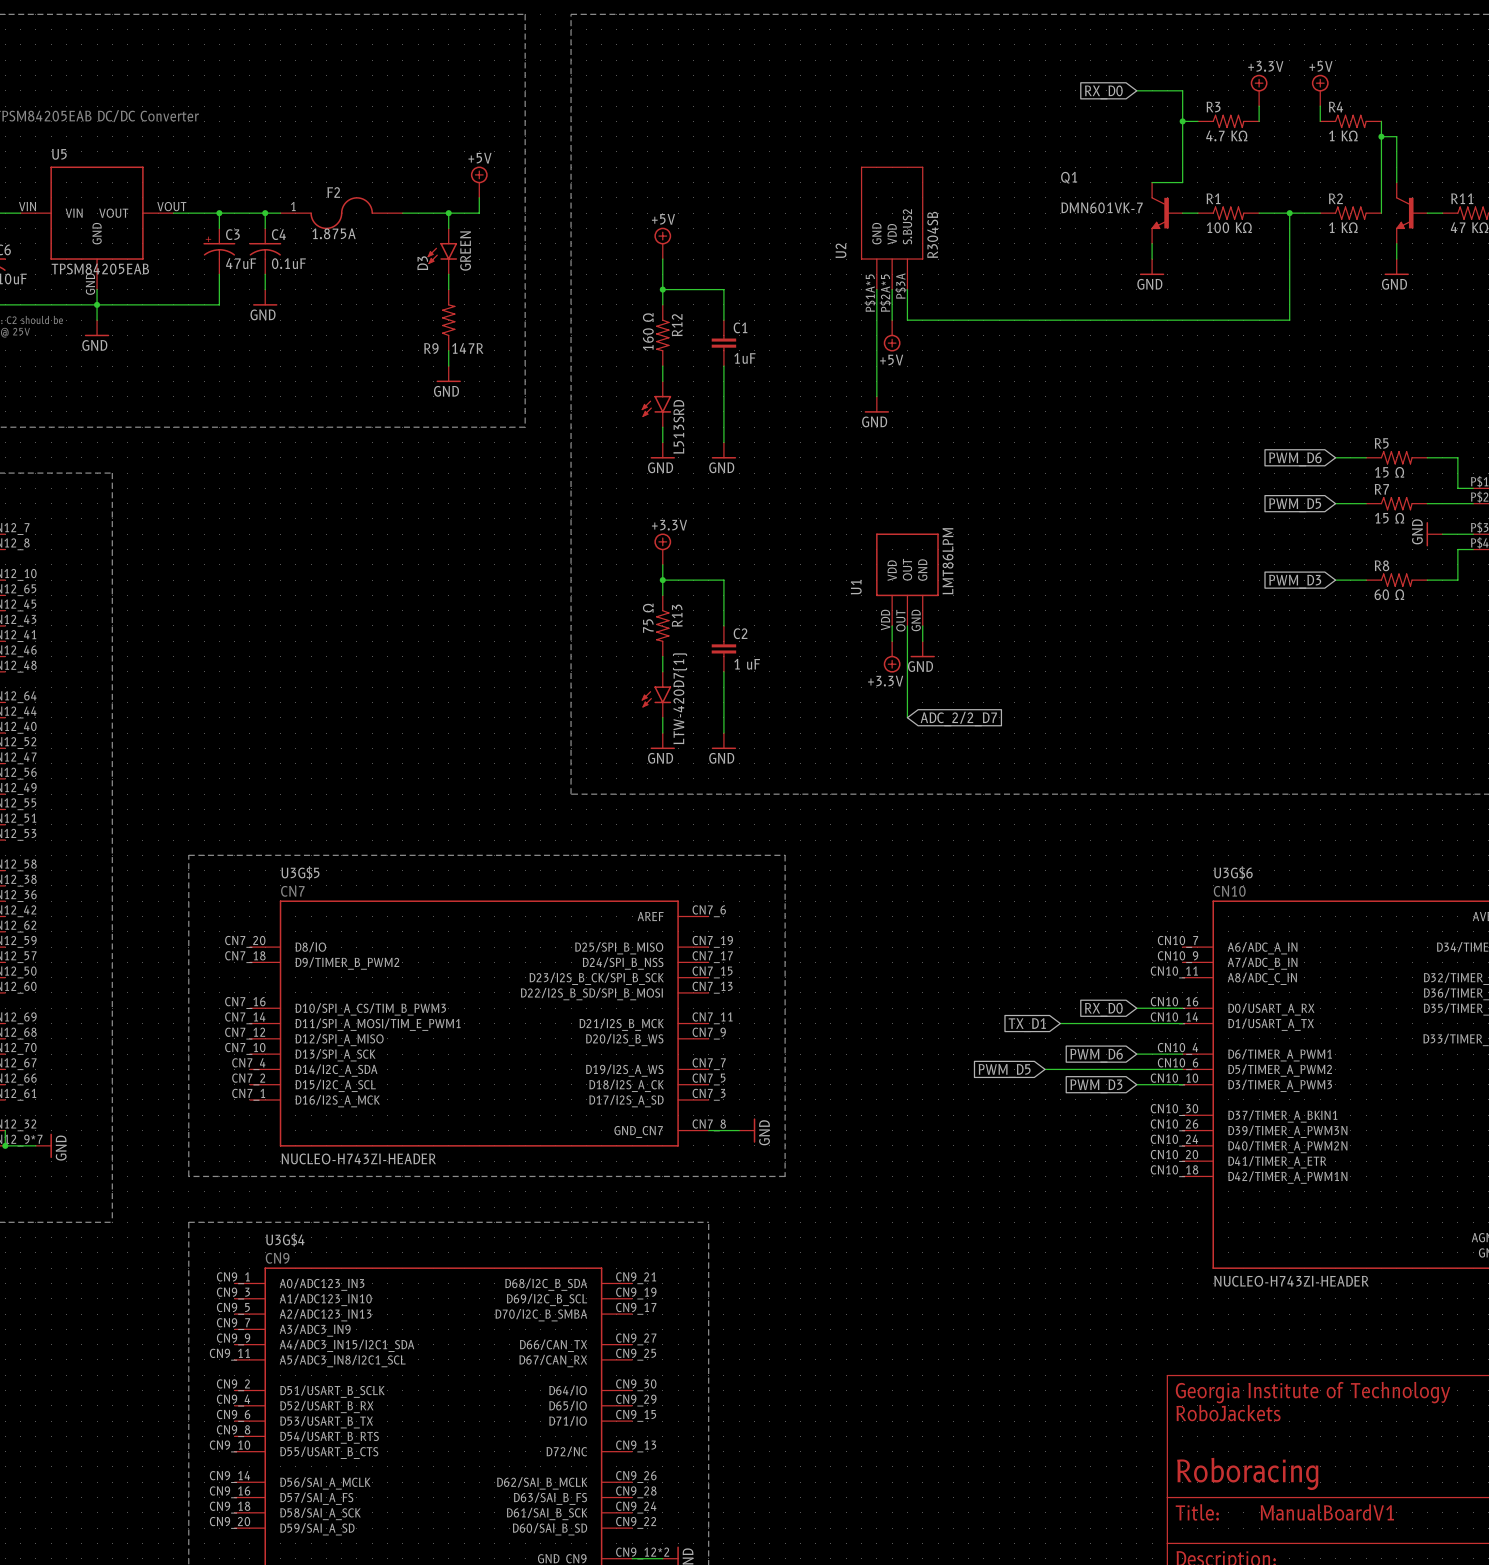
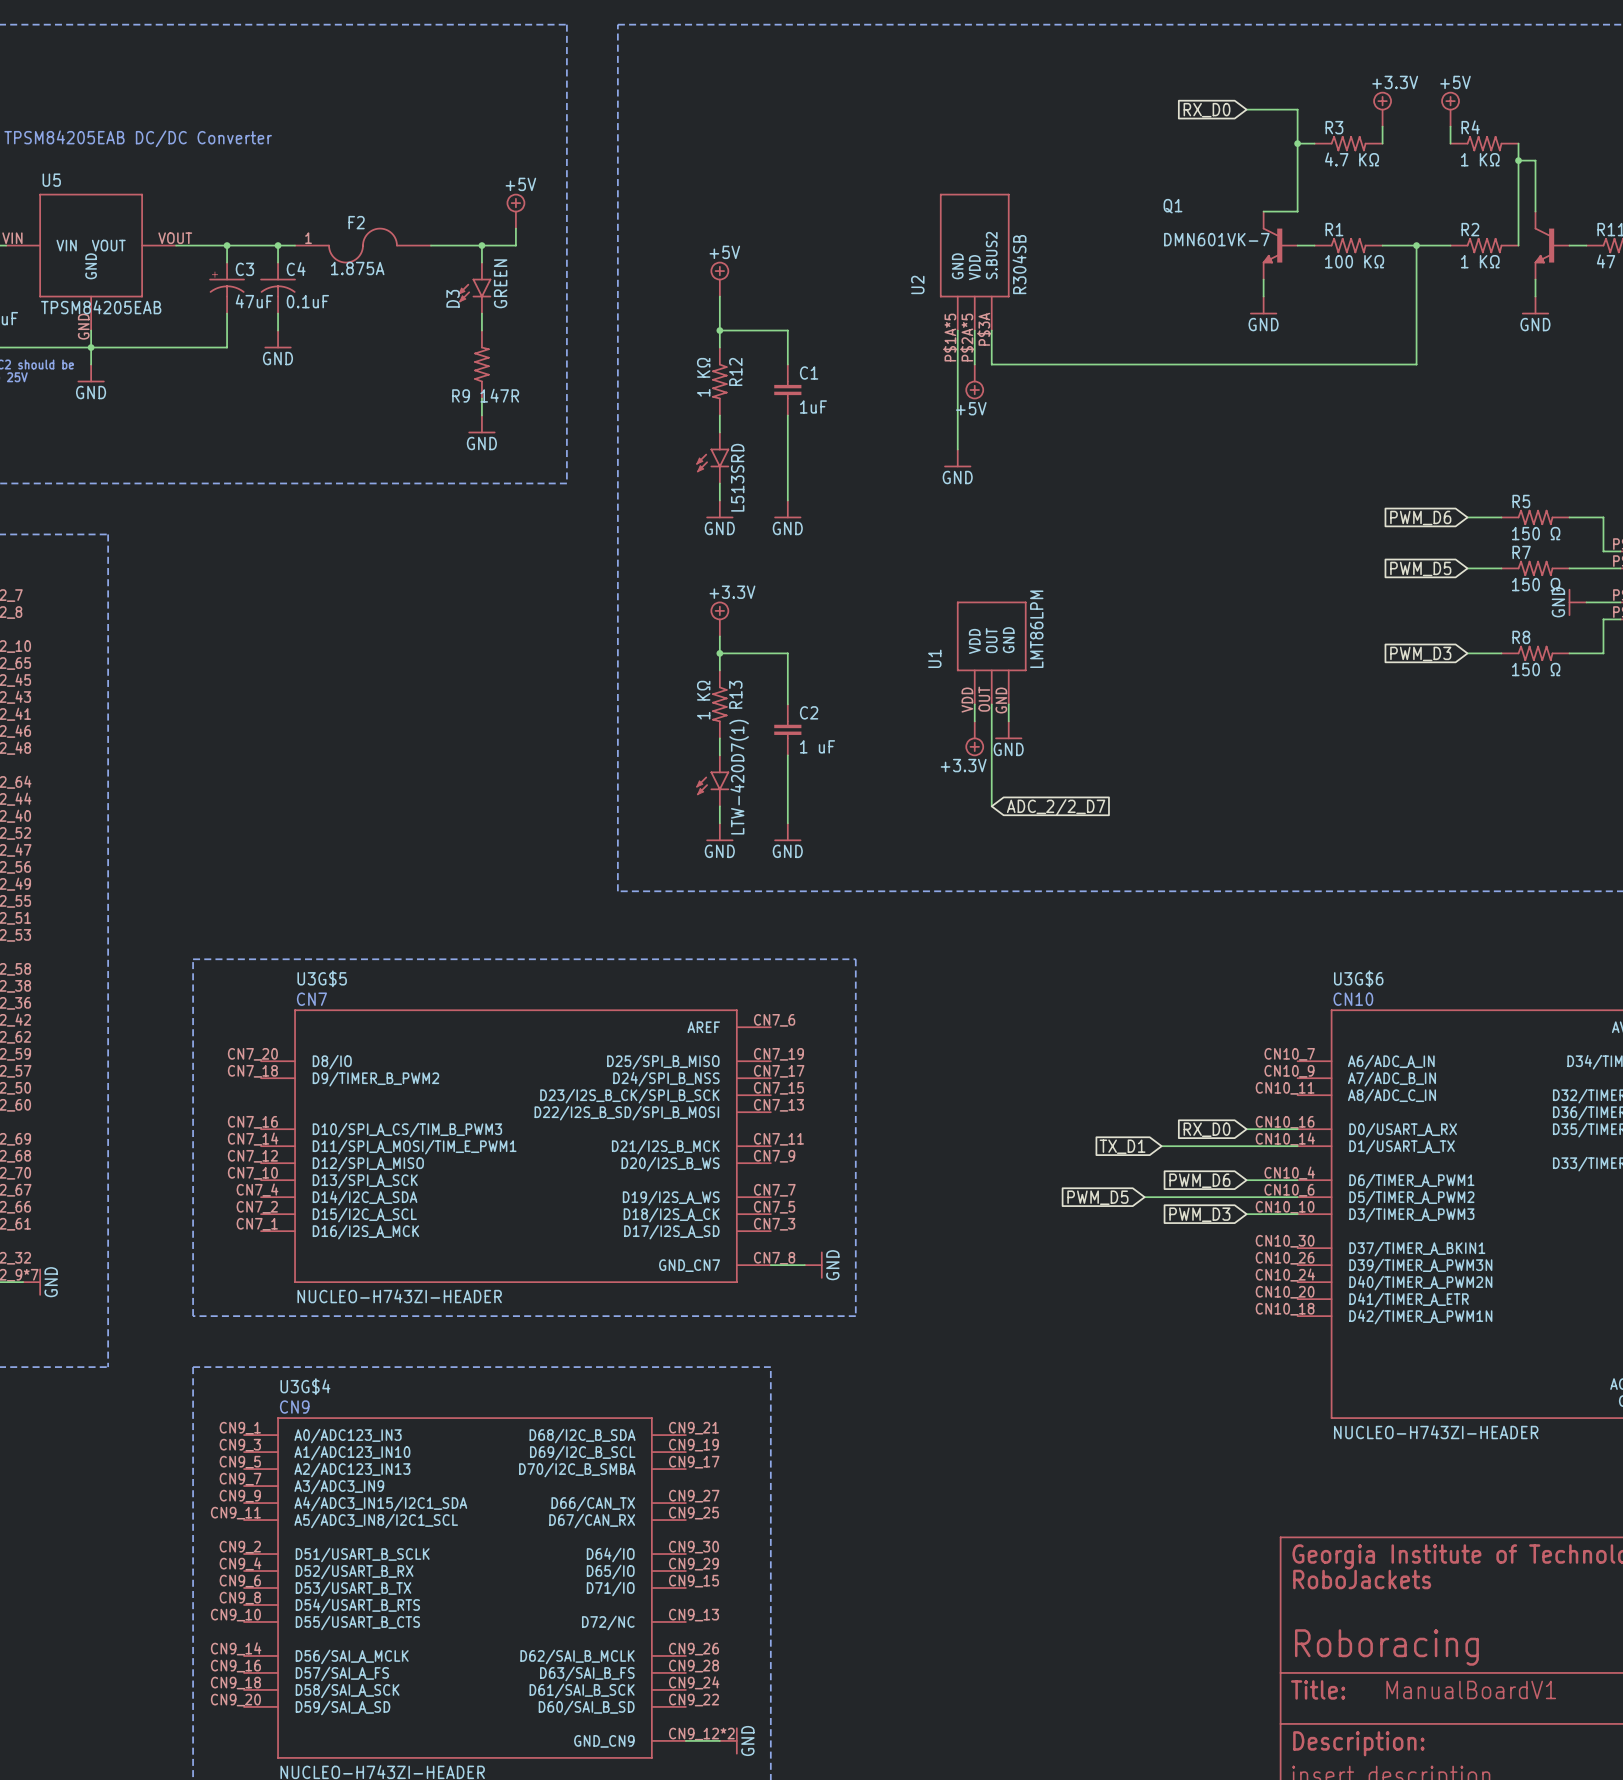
R12 value: 160 Ω (648, 331) -> 1 KΩ (703, 377)
R5 value: 15 Ω (1389, 472) -> 150 Ω (1536, 533)
R7 value: 15 Ω (1389, 518) -> 150 Ω (1536, 584)
R8 value: 60 Ω (1389, 594) -> 150 Ω (1536, 669)
R13 value: 75 Ω (648, 618) -> 1 KΩ (703, 700)

